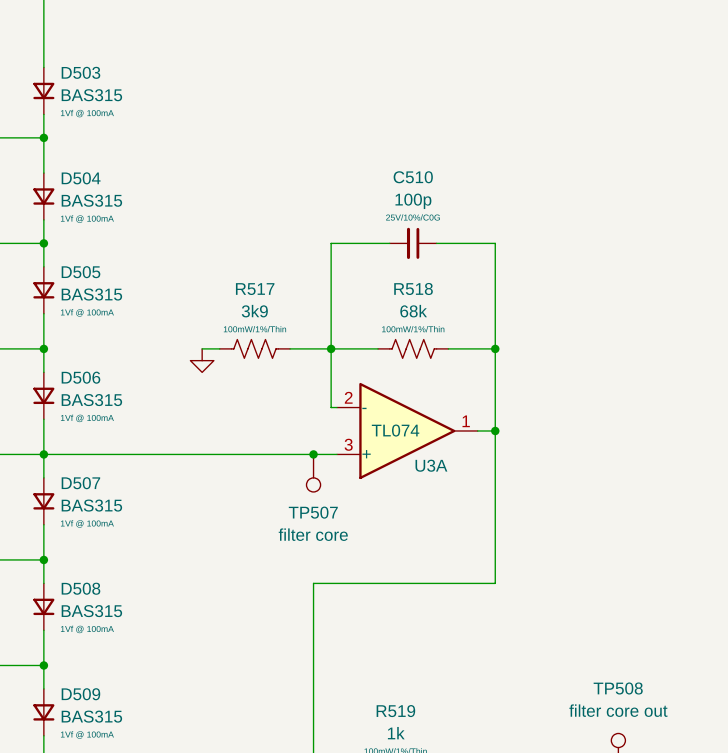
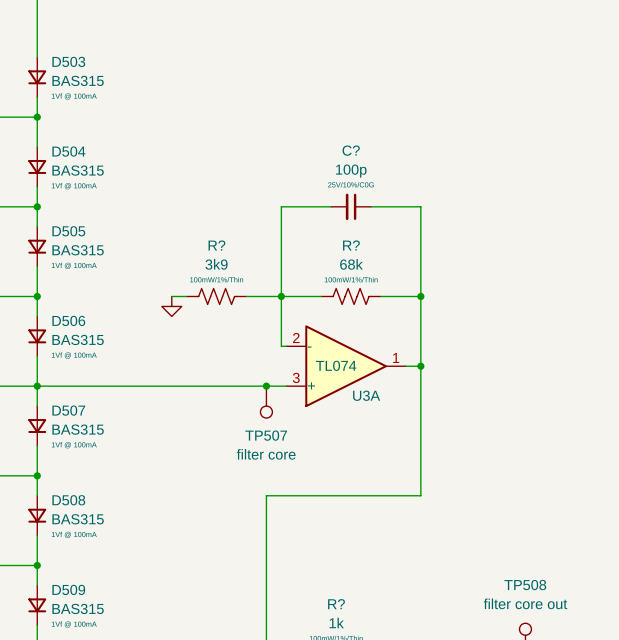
C510 name: C510 (413, 177) -> C? (351, 150)
R518 name: R518 (413, 288) -> R? (351, 245)
R517 name: R517 (255, 289) -> R? (216, 245)
R519 name: R519 (395, 711) -> R? (336, 604)

